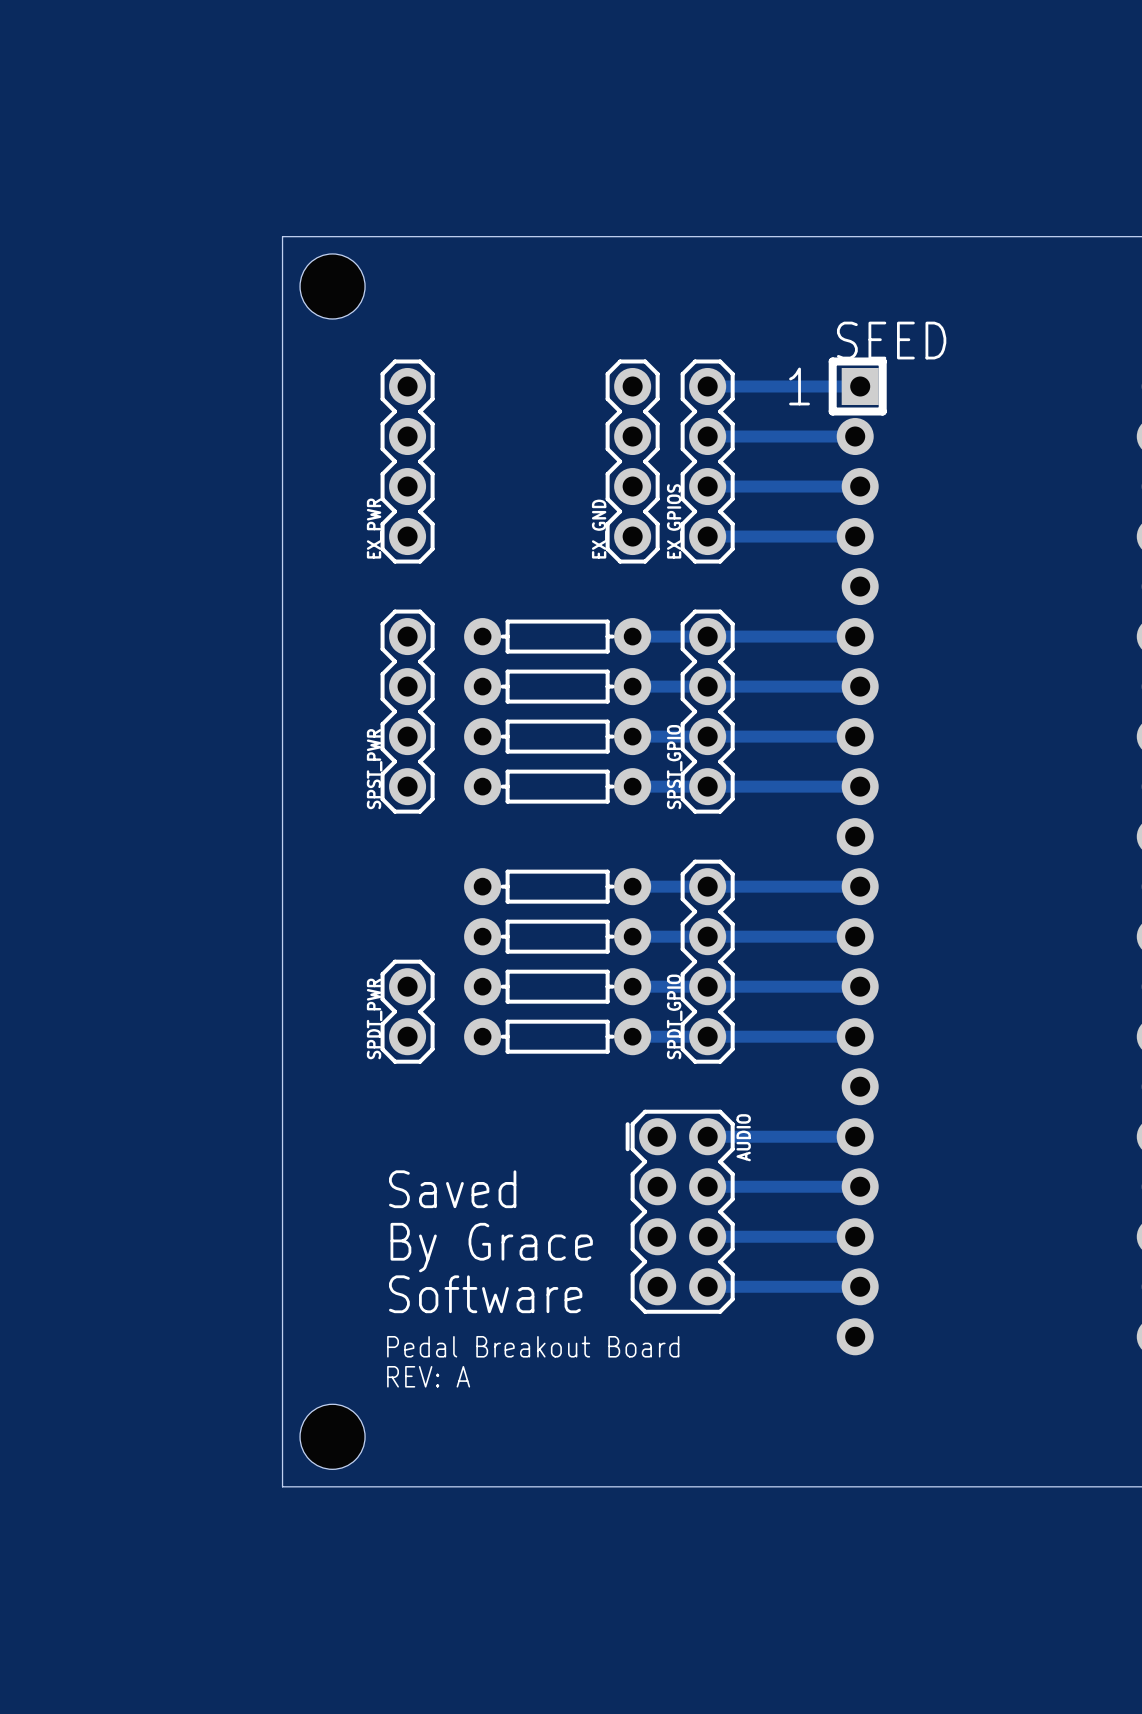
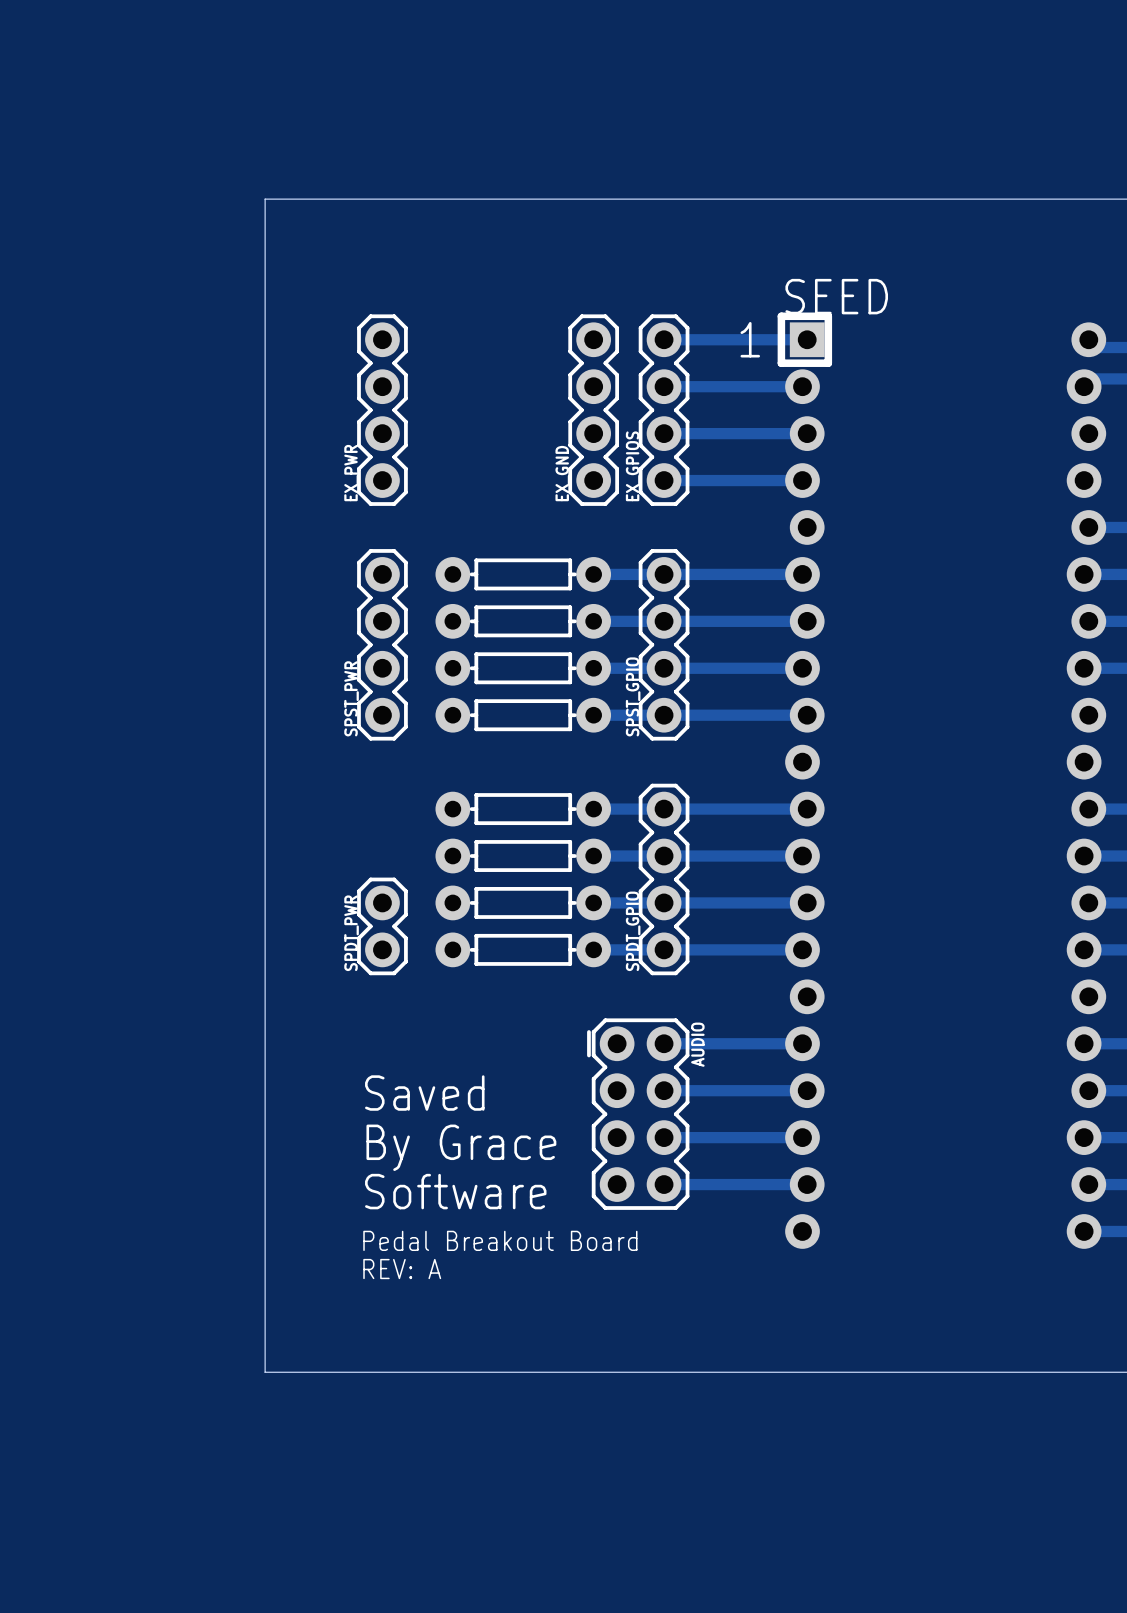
hole: (332, 286) -> none
hole: (332, 1436) -> none

